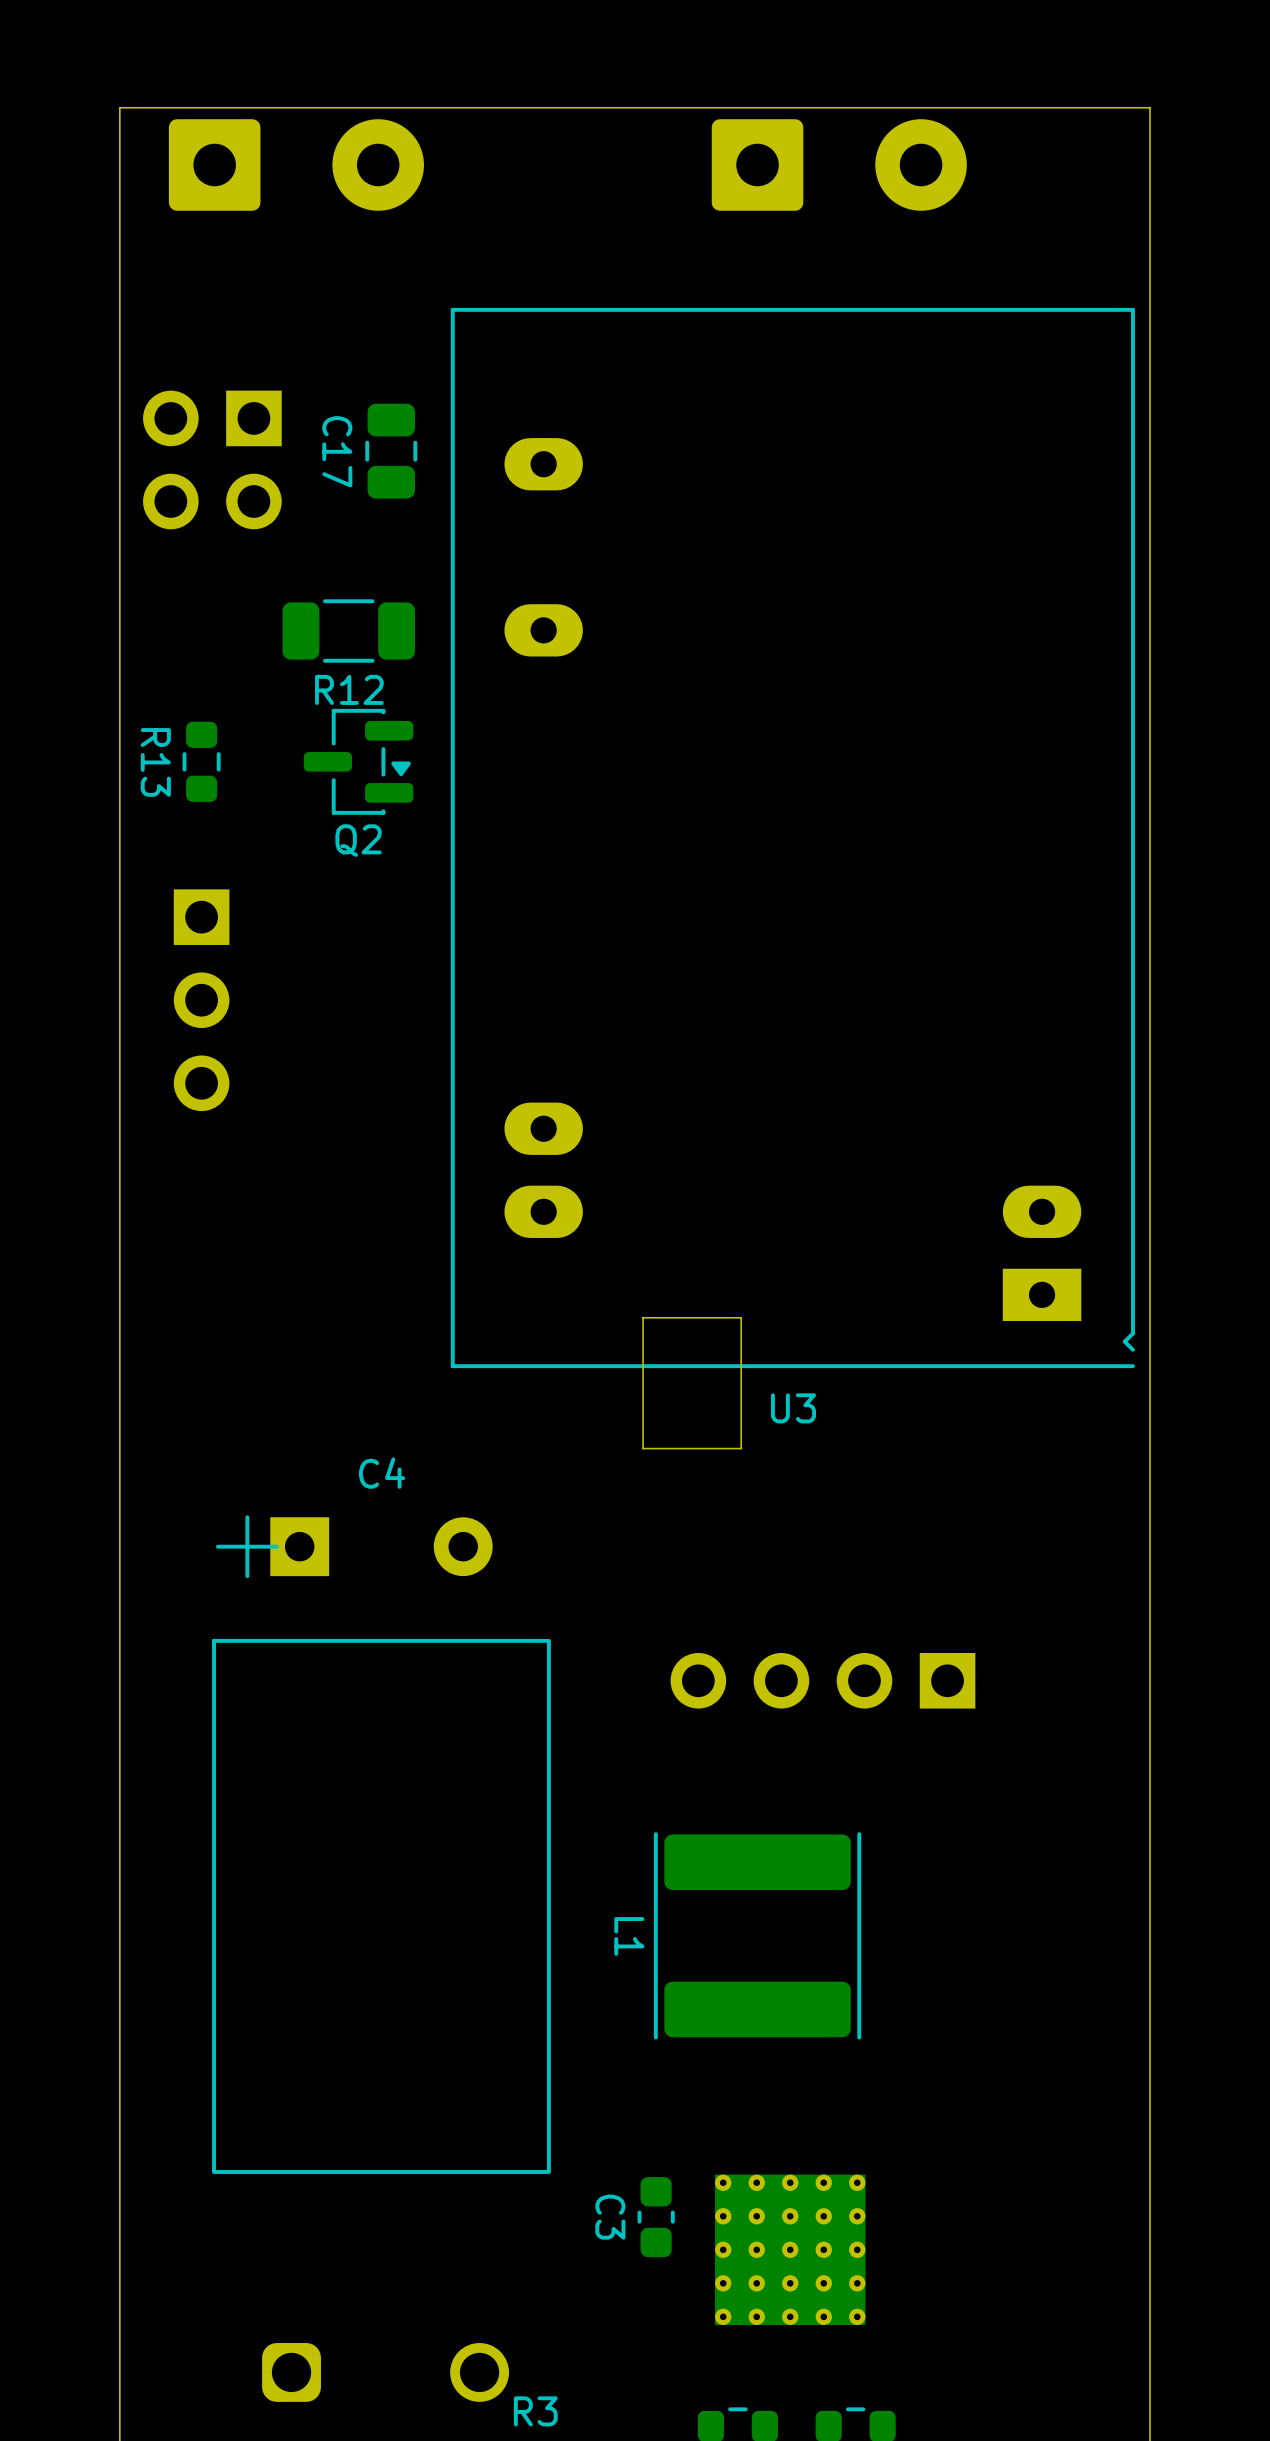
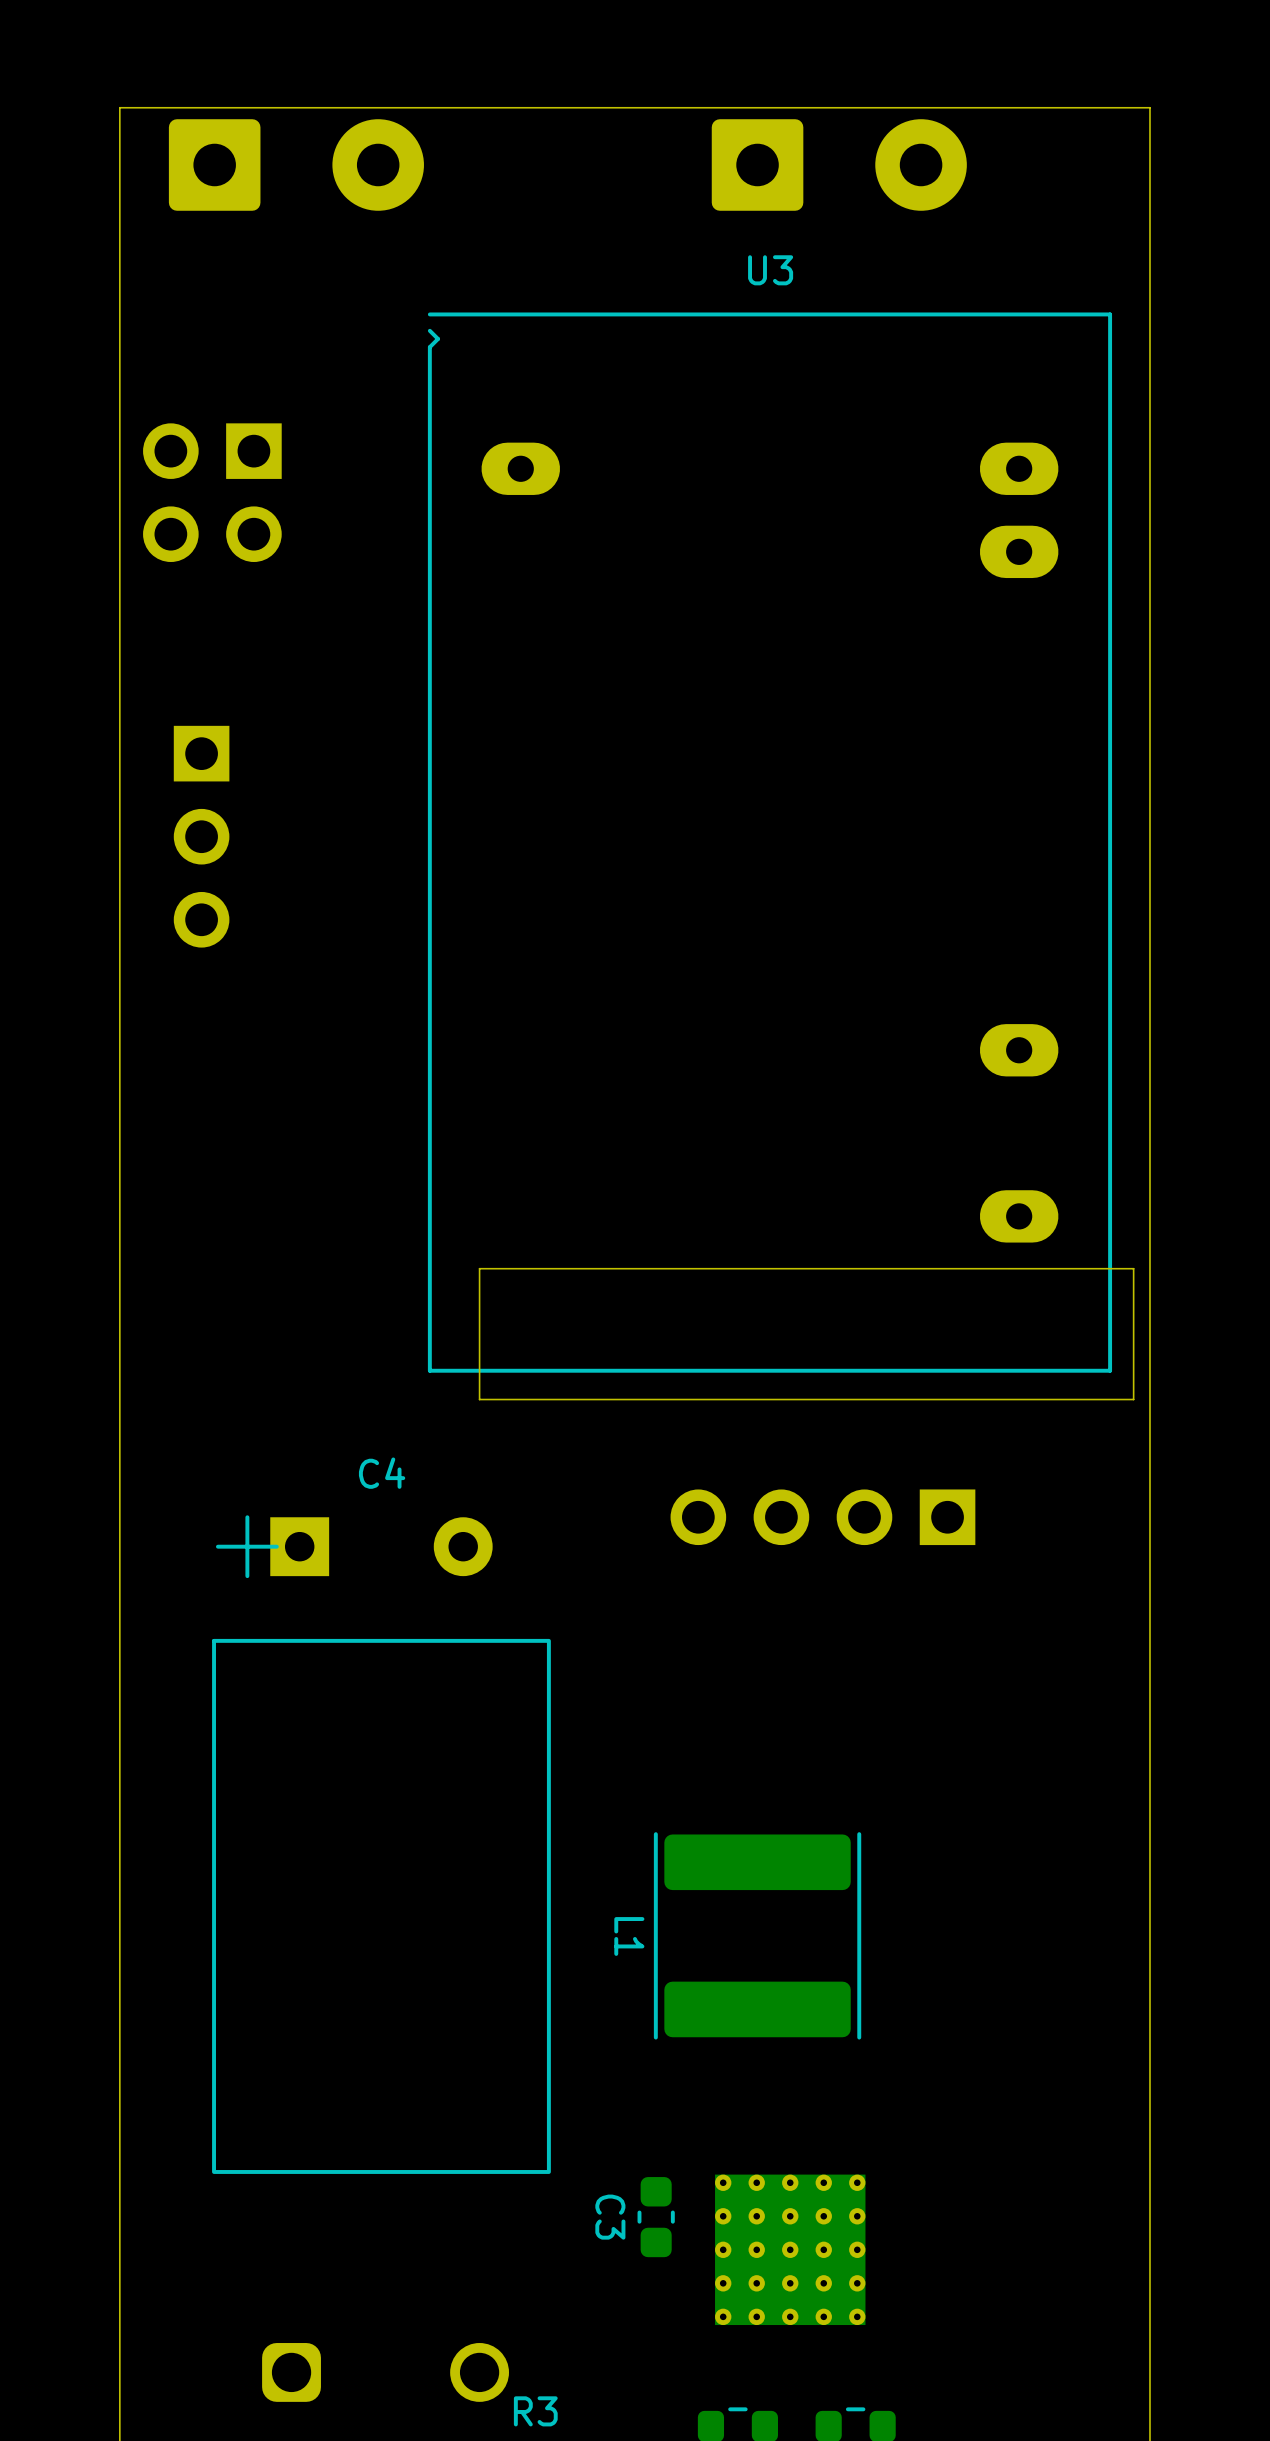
U3 footprint: [450, 307, 1135, 1369] -> [427, 312, 1113, 1373]
C17: (391, 451) -> none
part position: (212, 459) -> (212, 492)
R12: (348, 631) -> none
R13: (201, 761) -> none
Q2: (358, 761) -> none
part position: (201, 1000) -> (201, 836)
board edge: none -> (1133, 1268) (1133, 1399) (479, 1399) (479, 1268) (1133, 1268)
board edge: (741, 1317) (741, 1448) (643, 1448) (643, 1317) (741, 1317) -> none
U3 name position: U3 (793, 1408) -> U3 (770, 270)
part position: (822, 1680) -> (822, 1517)

